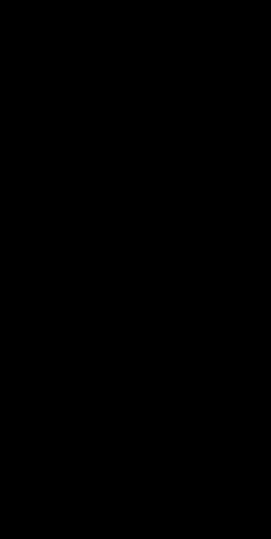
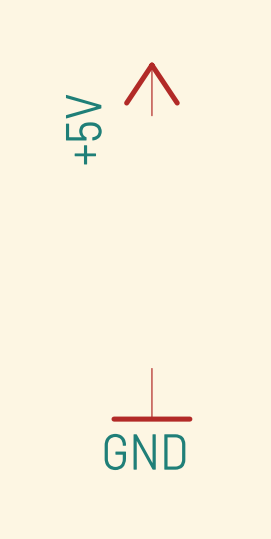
power symbol: none -> +5V (151, 89)
power symbol: none -> GND (151, 395)

